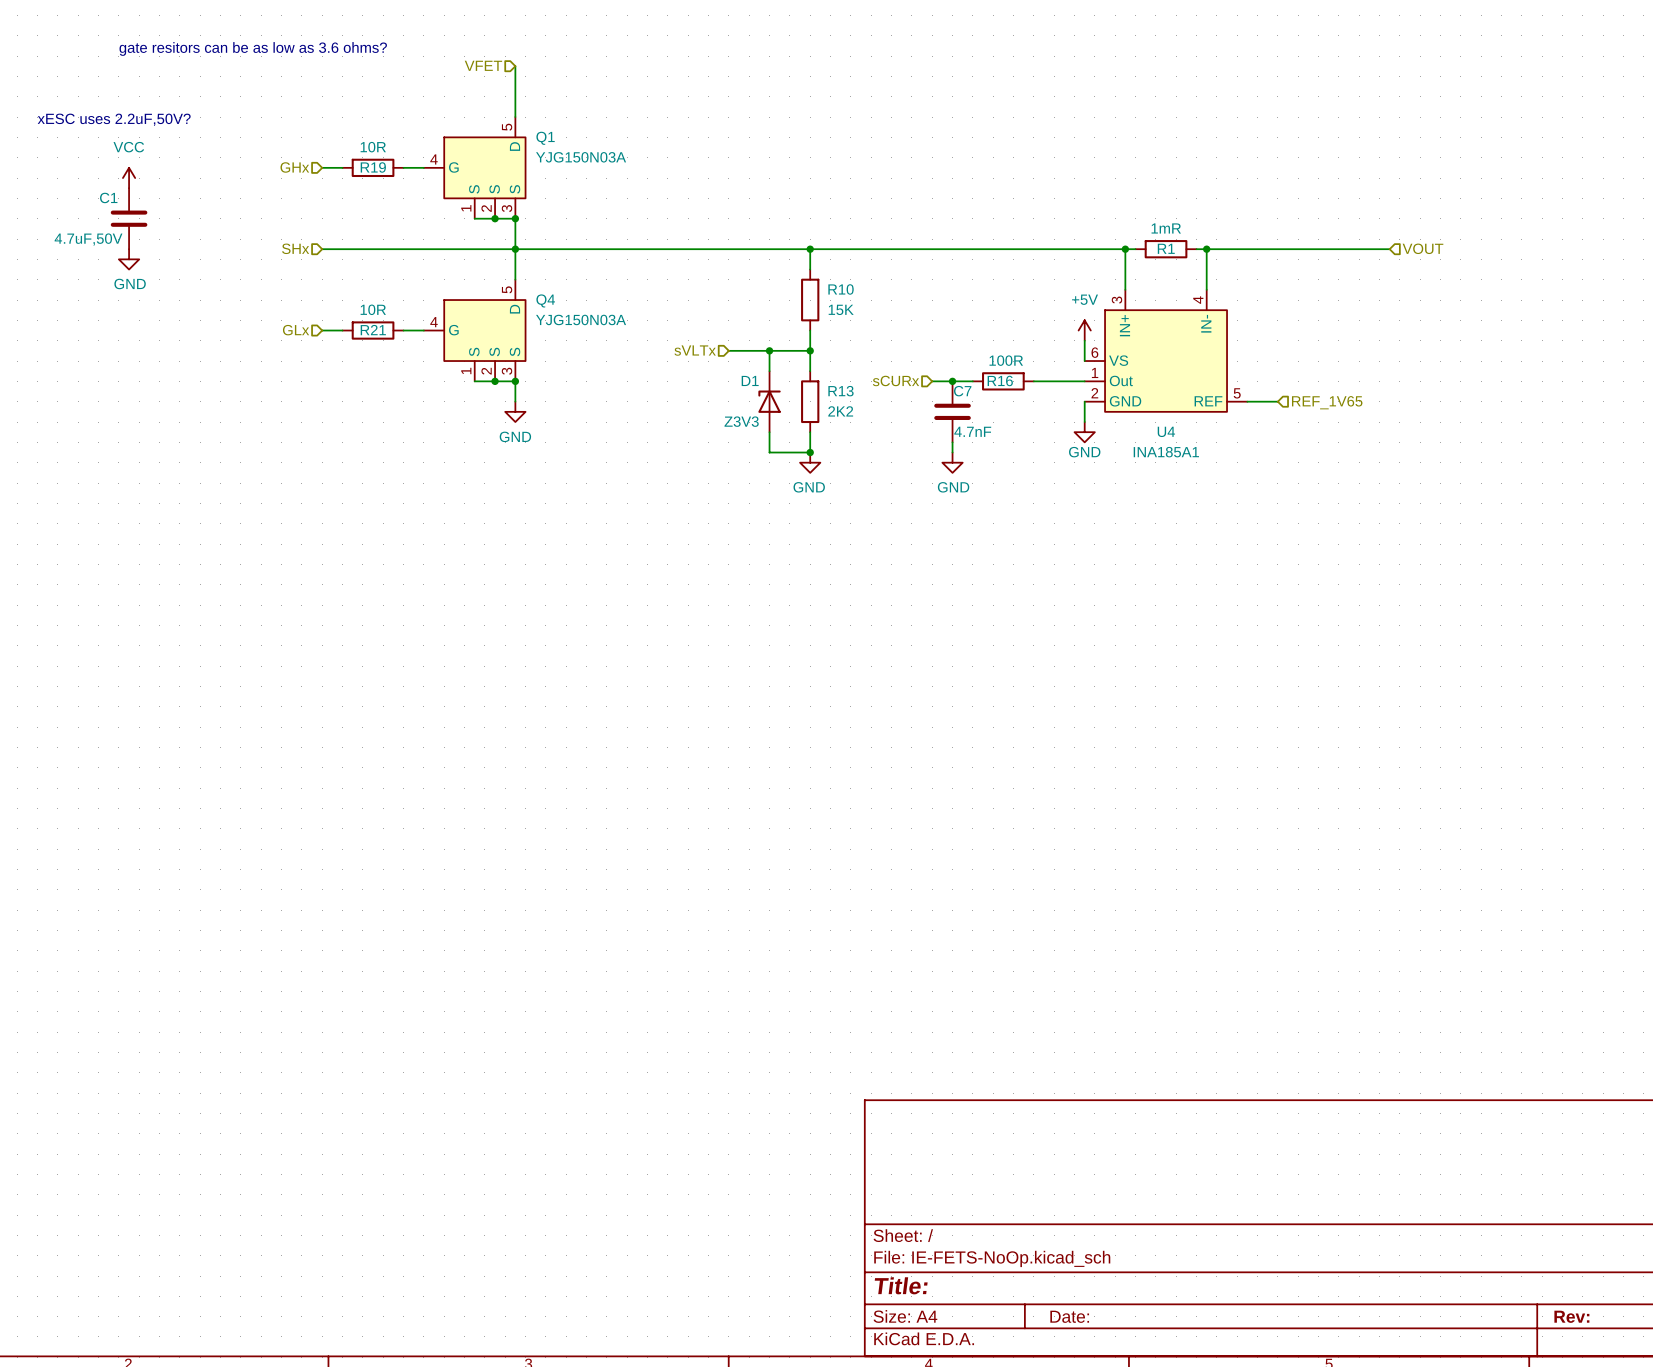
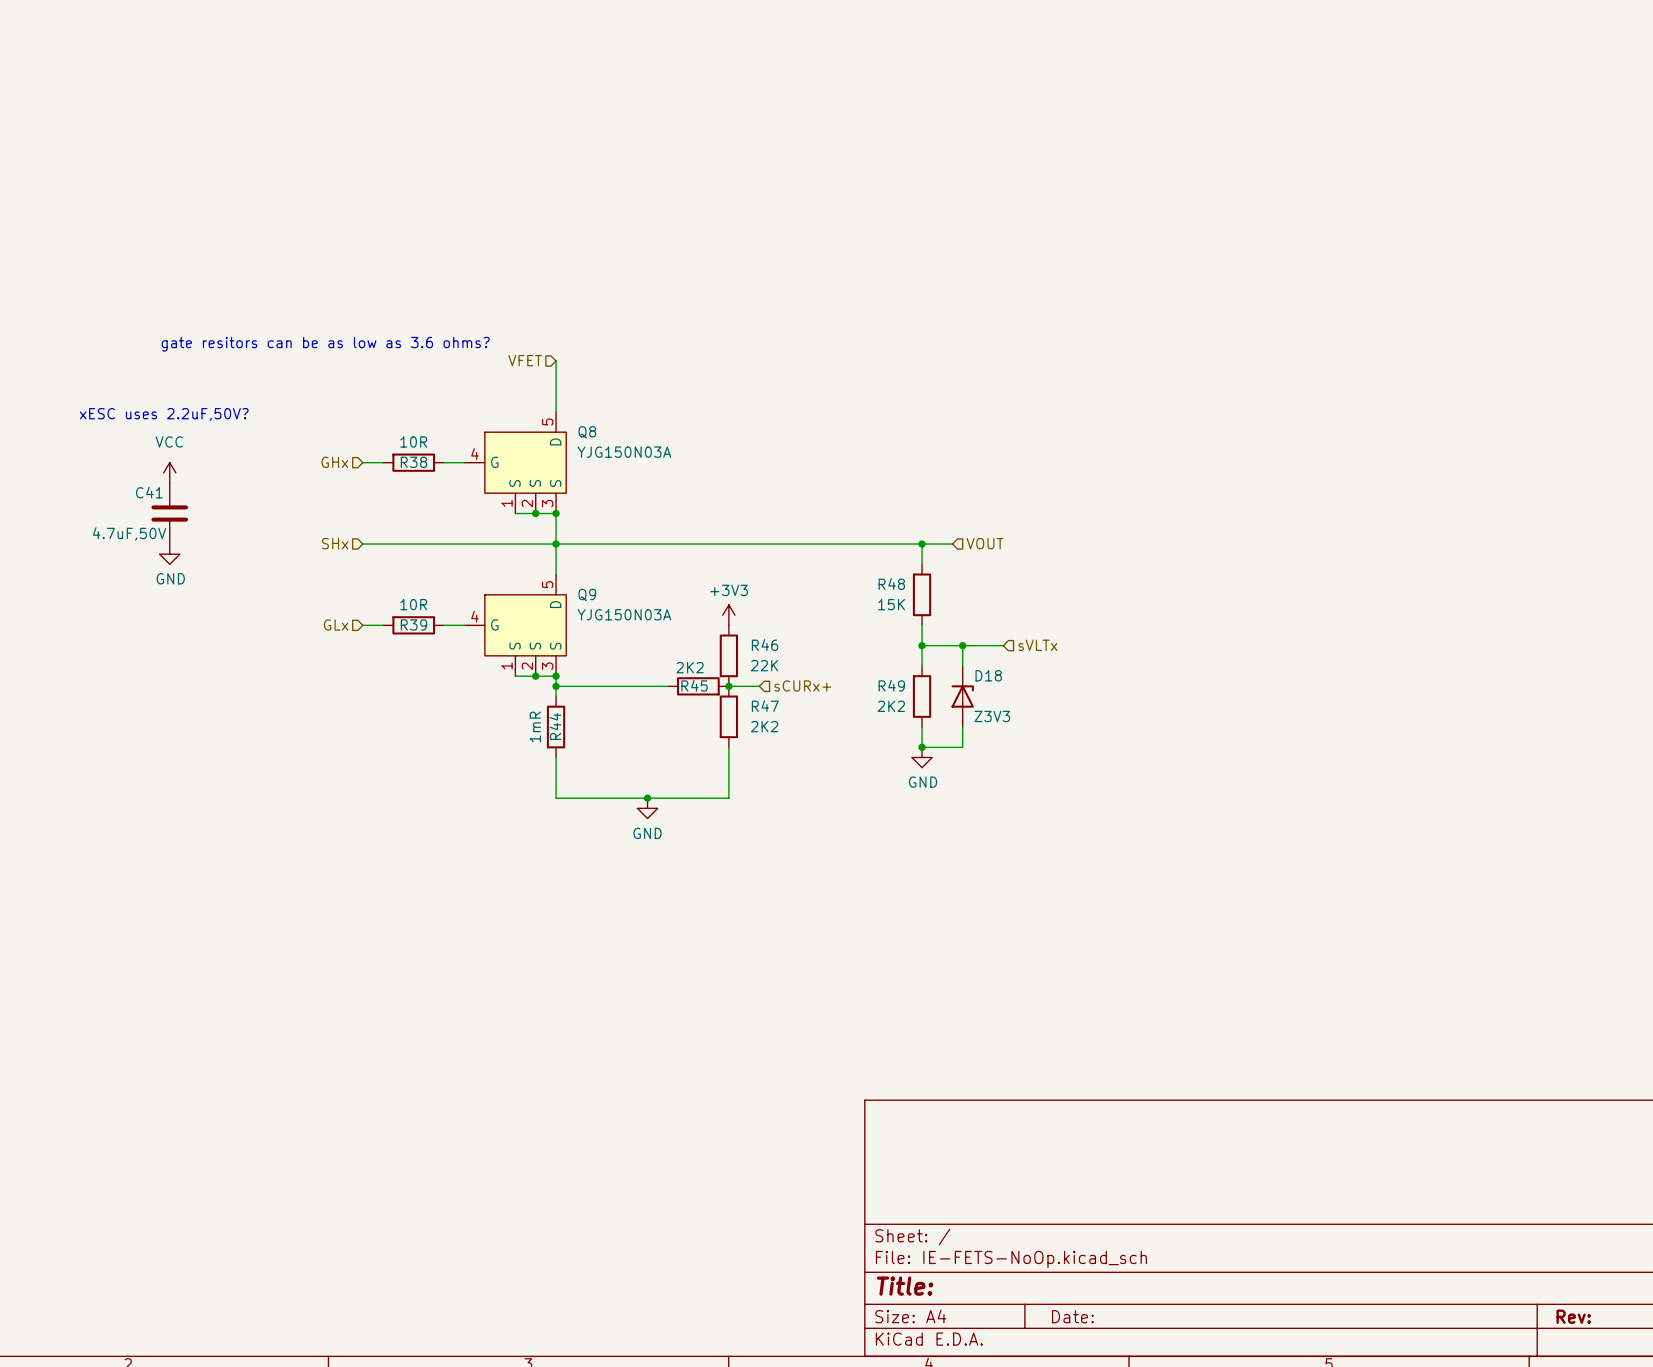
text: gate resitors can be as low as 3.6 ohms? (253, 48) -> none
hierarchical label: VFET (483, 65) -> none
wire: (515, 66) (515, 117) -> none
text: xESC uses 2.2uF,50V? (114, 119) -> none
Q1: YJG150N03A (474, 157) -> none
hierarchical label: GHx (294, 167) -> none
wire: (322, 167) (342, 167) -> none
R19: 10R (373, 167) -> none
wire: (403, 167) (423, 167) -> none
power symbol: VCC (129, 178) -> none
C1: 4.7uF,50V (129, 218) -> none
wire: (474, 218) (515, 218) (515, 279) -> none
junction: (495, 218) -> none
junction: (515, 218) -> none
hierarchical label: SHx (295, 248) -> none
hierarchical label: VOUT (1422, 248) -> none
wire: (322, 249) (1135, 249) -> none
junction: (515, 249) -> none
wire: (810, 249) (810, 269) -> none
junction: (810, 249) -> none
wire: (1125, 249) (1125, 289) -> none
junction: (1125, 249) -> none
R1: 1mR (1166, 249) -> none
wire: (1196, 249) (1389, 249) -> none
wire: (1206, 249) (1206, 289) -> none
junction: (1206, 249) -> none
power symbol: GND (129, 259) -> none
R10: 15K (810, 300) -> none
Q4: YJG150N03A (474, 320) -> none
hierarchical label: GLx (296, 330) -> none
wire: (322, 330) (342, 330) -> (362, 462) (383, 462)
R21: 10R (373, 330) -> none
wire: (403, 330) (423, 330) -> (444, 462) (464, 462)
wire: (810, 330) (810, 371) -> none
power symbol: +5V (1084, 330) -> none
wire: (1084, 340) (1084, 361) -> none
text: none -> gate resitors can be as low as 3.6 ohms? (325, 344)
hierarchical label: sVLTx (695, 350) -> none
wire: (728, 350) (810, 350) -> none
wire: (769, 350) (769, 371) -> none
junction: (769, 350) -> none
junction: (810, 350) -> none
U4: INA185A1 (1166, 350) -> none
hierarchical label: none -> VFET (525, 360)
wire: none -> (556, 361) (556, 411)
hierarchical label: sCURx (896, 380) -> none
wire: (474, 381) (515, 381) (515, 401) -> none
junction: (495, 381) -> none
junction: (515, 381) -> none
wire: (932, 381) (972, 381) -> none
junction: (952, 381) -> none
R16: 100R (1003, 381) -> none
wire: (1033, 381) (1084, 381) -> none
D1: Z3V3 (769, 401) -> none
R13: 2K2 (810, 401) -> none
wire: (1084, 401) (1084, 422) -> none
wire: (1247, 401) (1277, 401) -> none
hierarchical label: REF_1V65 (1327, 402) -> none
power symbol: GND (515, 411) -> none
C7: 4.7nF (952, 411) -> none
text: none -> xESC uses 2.2uF,50V? (164, 414)
wire: (769, 432) (769, 452) (810, 452) (810, 432) -> none
power symbol: GND (1084, 432) -> none
wire: (952, 442) (952, 452) -> none
Q8: none -> YJG150N03A (515, 452)
junction: (810, 452) -> none
hierarchical label: none -> GHx (334, 462)
R38: none -> 10R (413, 462)
power symbol: GND (810, 462) -> none
power symbol: GND (952, 462) -> none
power symbol: none -> VCC (169, 472)
C41: none -> 4.7uF,50V (169, 513)
wire: none -> (515, 513) (556, 513) (556, 574)
junction: none -> (535, 513)
junction: none -> (556, 513)
hierarchical label: none -> SHx (335, 543)
hierarchical label: none -> VOUT (985, 543)
wire: none -> (362, 544) (952, 544)
junction: none -> (556, 544)
wire: none -> (922, 544) (922, 564)
junction: none -> (922, 544)
power symbol: none -> GND (169, 554)
R48: none -> 15K (922, 594)
Q9: none -> YJG150N03A (515, 615)
power symbol: none -> +3V3 (728, 615)
hierarchical label: none -> GLx (336, 624)
wire: none -> (362, 625) (383, 625)
R39: none -> 10R (413, 625)
wire: none -> (444, 625) (464, 625)
wire: none -> (922, 625) (922, 666)
wire: none -> (922, 645) (1003, 645)
junction: none -> (922, 645)
wire: none -> (962, 645) (962, 666)
junction: none -> (962, 645)
hierarchical label: none -> sVLTx (1037, 645)
R46: none -> 22K (728, 655)
wire: none -> (515, 676) (556, 676) (556, 696)
junction: none -> (535, 676)
junction: none -> (556, 676)
hierarchical label: none -> sCURx+ (802, 685)
wire: none -> (556, 686) (667, 686)
junction: none -> (556, 686)
R45: none -> 2K2 (698, 686)
wire: none -> (728, 686) (759, 686)
junction: none -> (728, 686)
R49: none -> 2K2 (922, 696)
D18: none -> Z3V3 (962, 696)
R47: none -> 2K2 (728, 716)
R44: none -> 1mR (556, 727)
wire: none -> (922, 727) (922, 747) (962, 747) (962, 727)
wire: none -> (728, 747) (728, 798) (556, 798) (556, 757)
junction: none -> (922, 747)
power symbol: none -> GND (922, 757)
junction: none -> (647, 798)
power symbol: none -> GND (647, 808)

